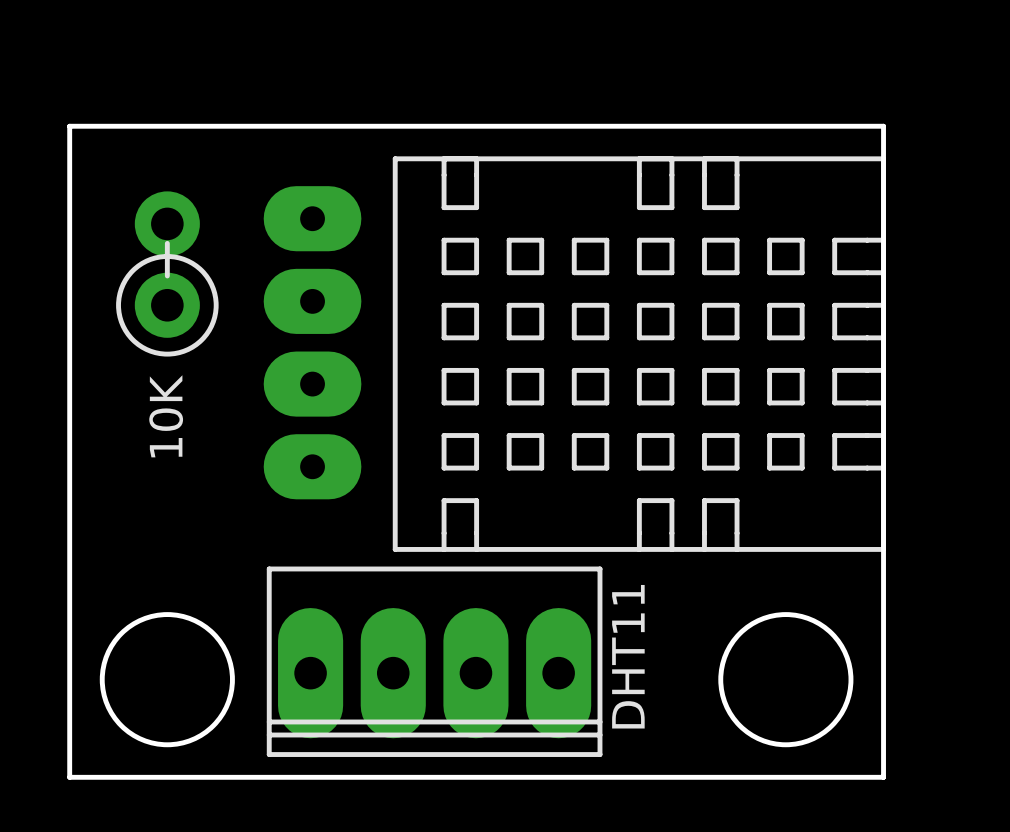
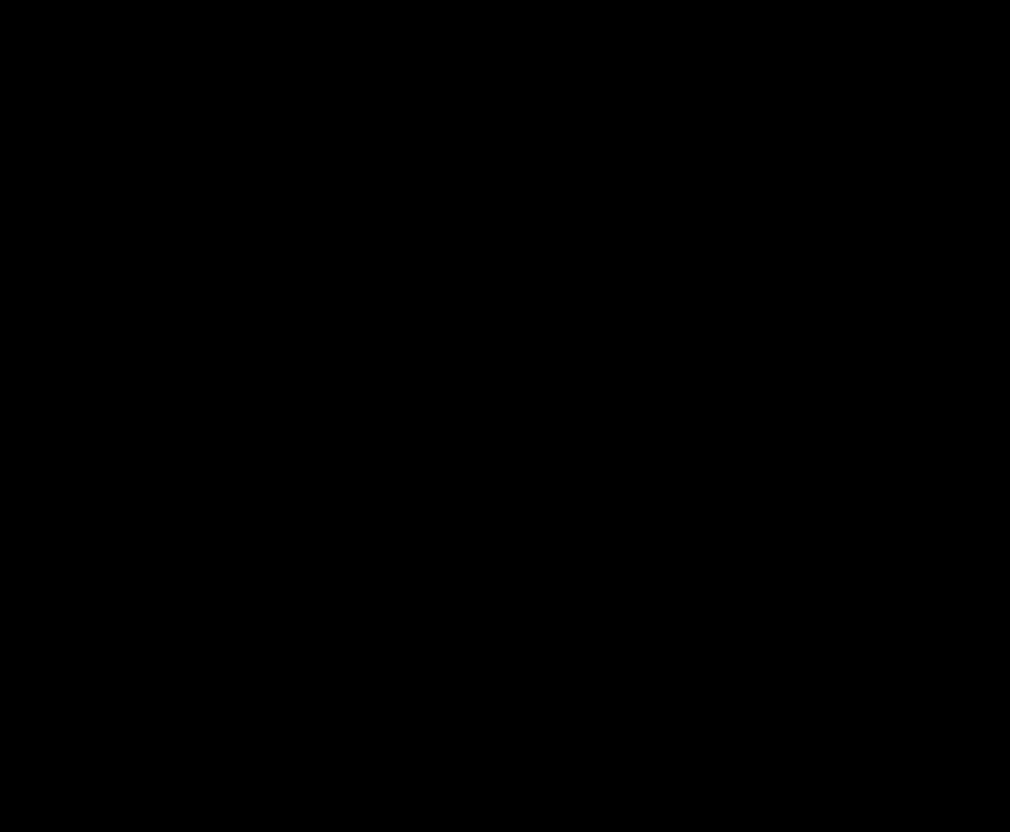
board edge: (69, 126) (883, 126) (883, 777) (69, 777) (69, 126) -> none
part: 10K (167, 273) -> none
part: (574, 354) -> none
round board edge: [99, 612, 235, 748] -> none
round board edge: [718, 612, 854, 748] -> none
part: DHT11 (434, 661) -> none

